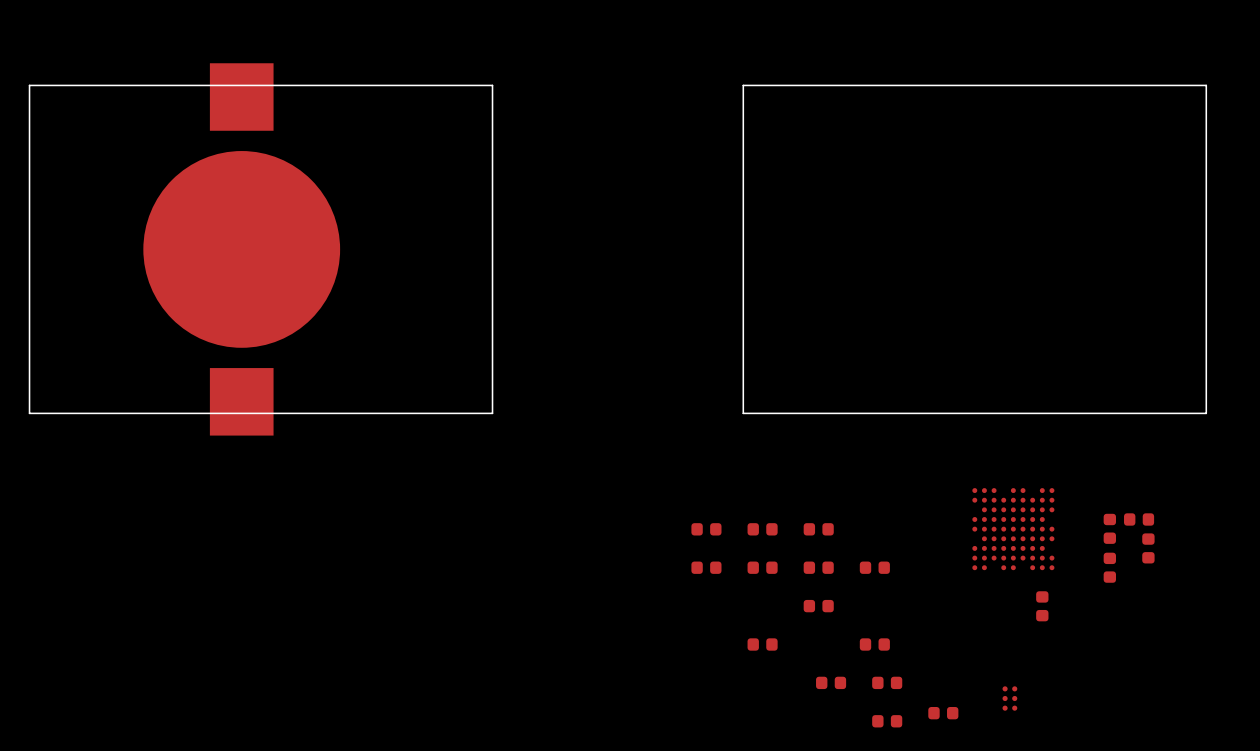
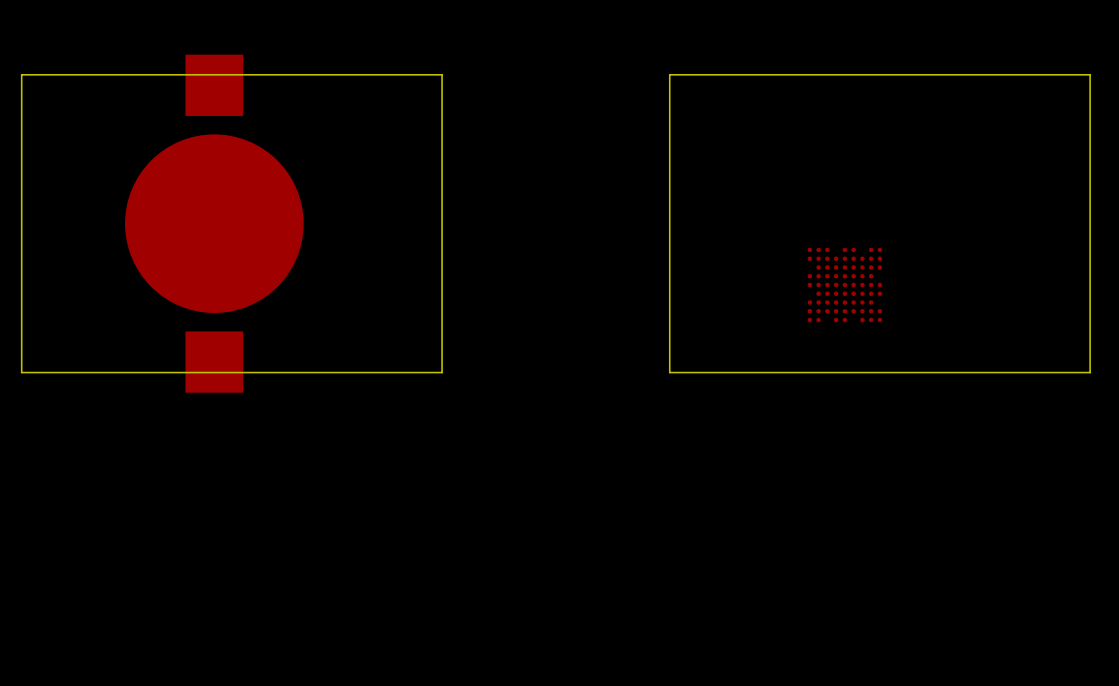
part: (1139, 519) -> none
part: (1109, 528) -> none
part: (706, 529) -> none
part: (762, 529) -> none
part: (818, 529) -> none
part position: (1013, 529) -> (844, 284)
part: (1148, 548) -> none
part: (706, 567) -> none
part: (762, 567) -> none
part: (818, 567) -> none
part: (874, 567) -> none
part: (1109, 567) -> none
part: (818, 606) -> none
part: (1042, 606) -> none
part: (762, 644) -> none
part: (874, 644) -> none
part: (831, 682) -> none
part: (887, 682) -> none
part: (1009, 698) -> none
part: (943, 713) -> none
part: (887, 721) -> none

